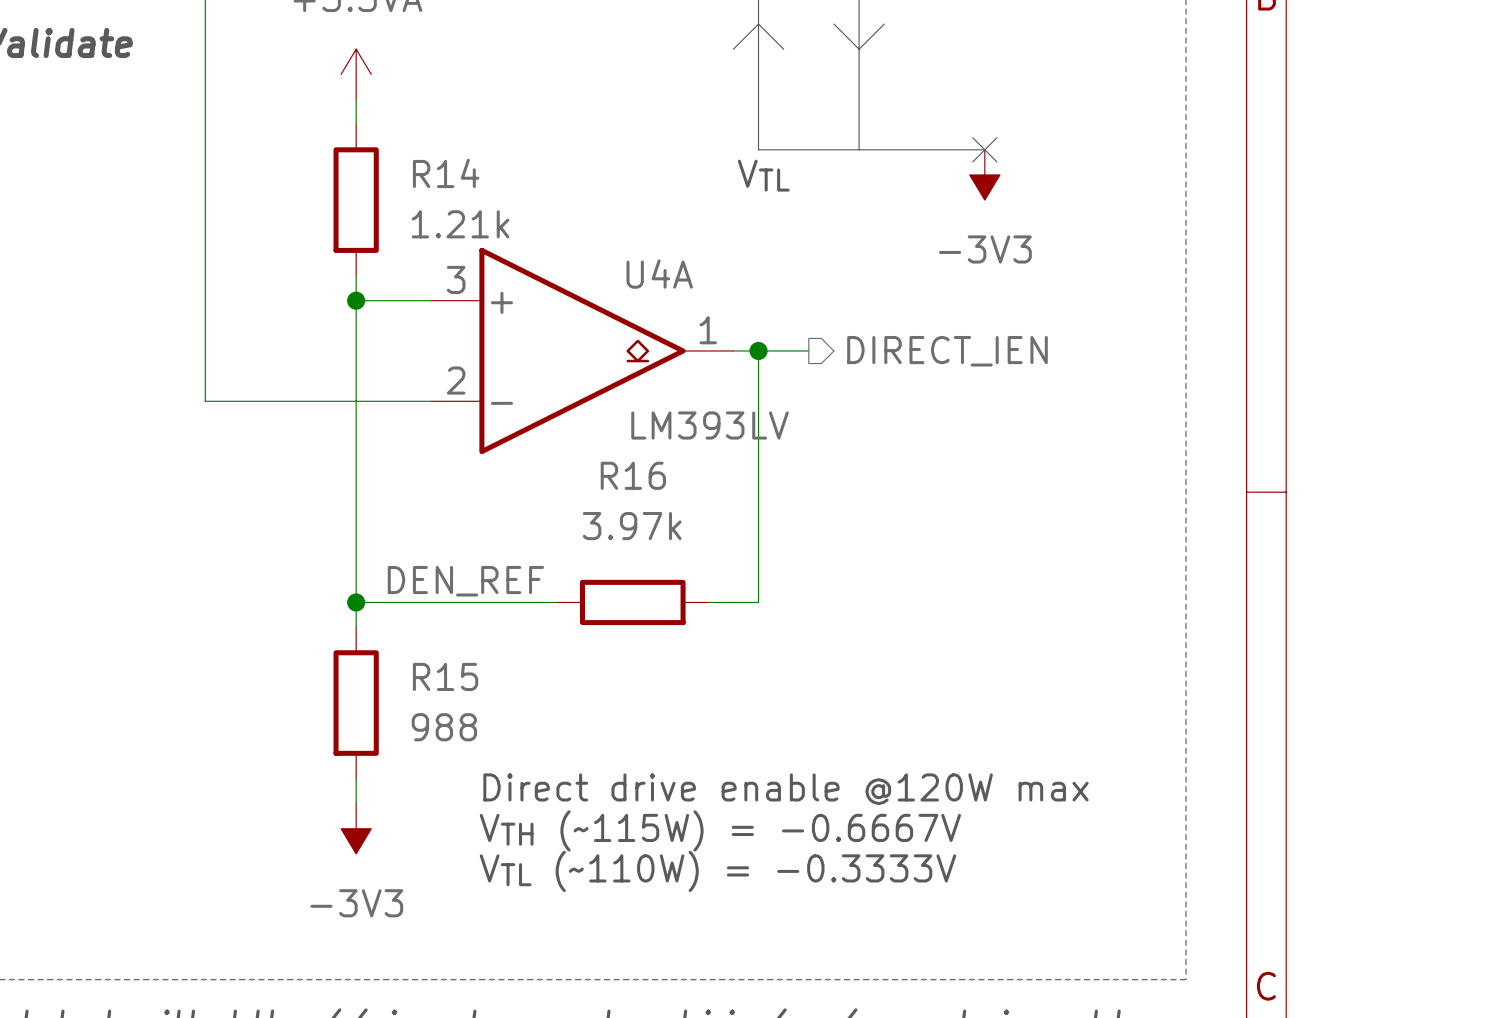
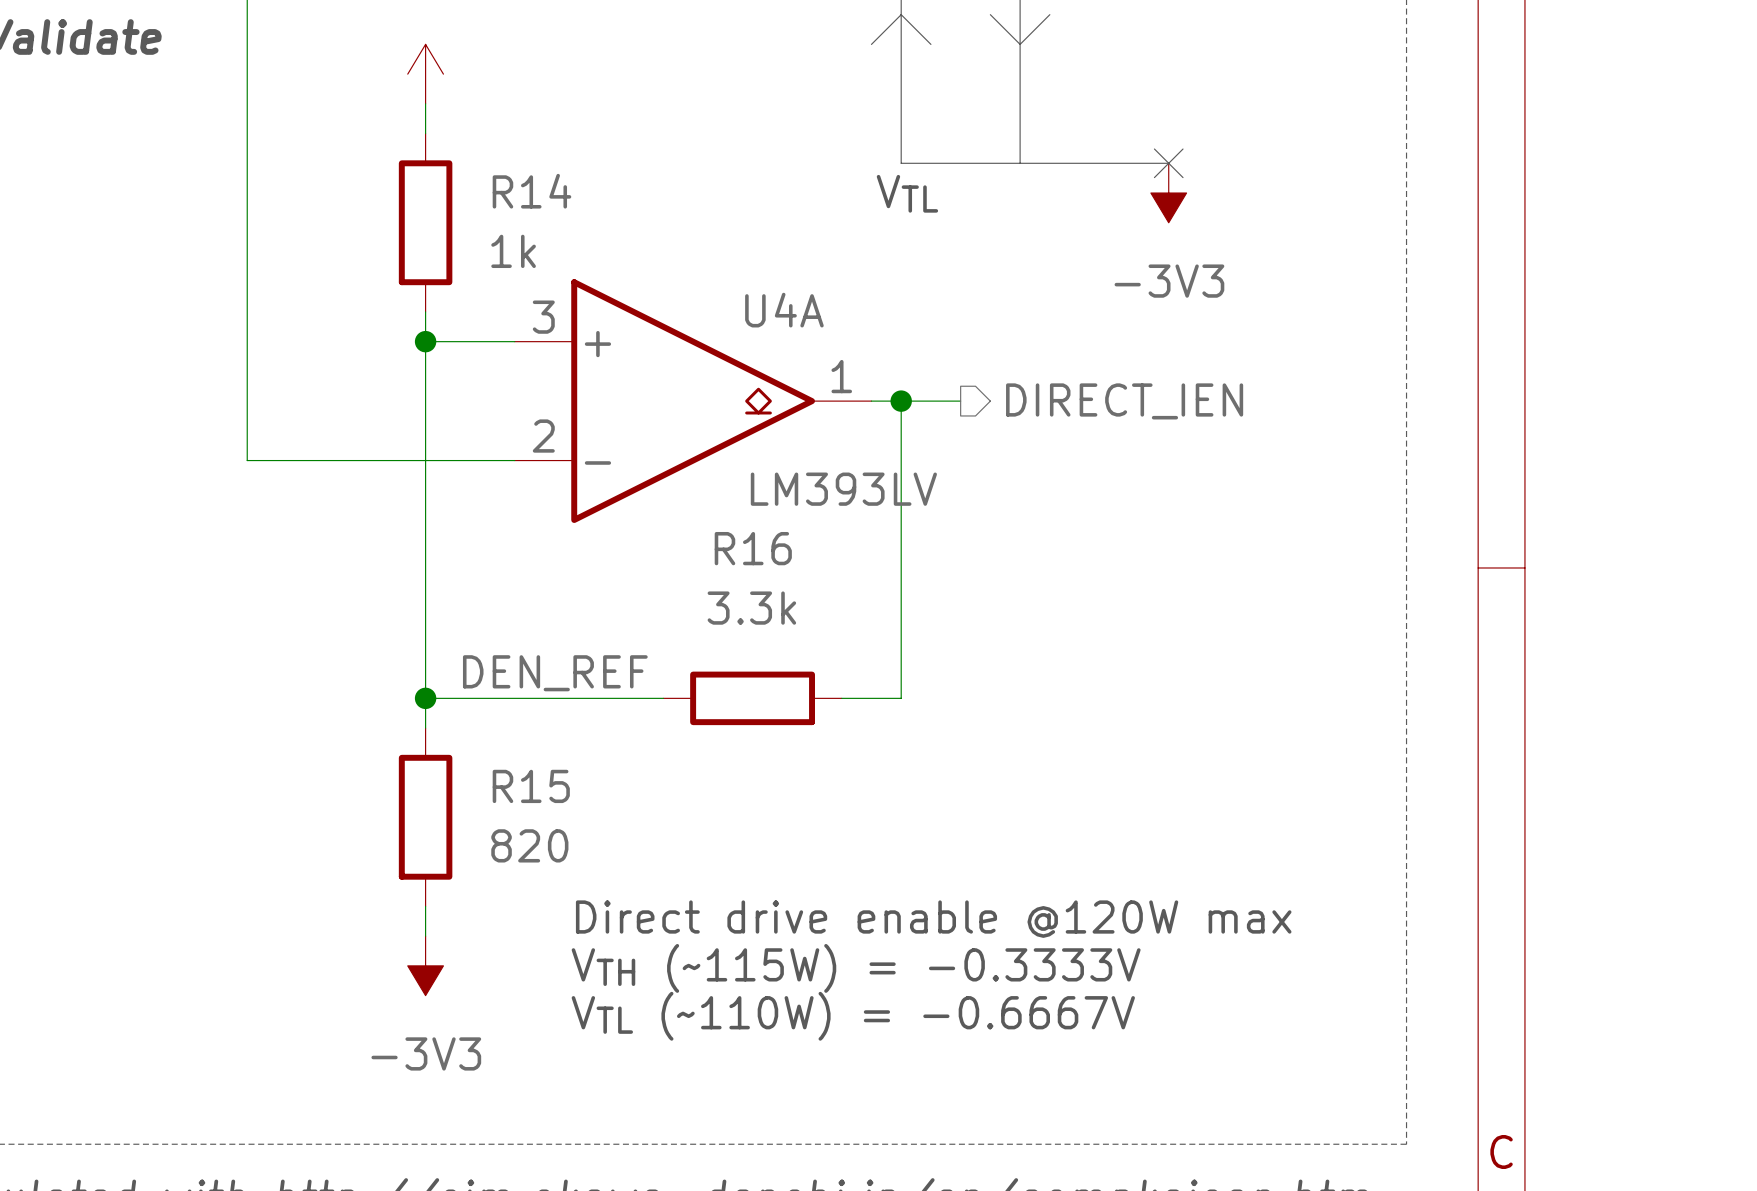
R14 value: 1.21k (460, 224) -> 1k (513, 251)
R16 value: 3.97k (632, 526) -> 3.3k (751, 608)
R15 value: 988 (444, 727) -> 820 (529, 845)
text: VTH (~115W) = -0.6667V (720, 830) -> VTH (~115W) = -0.3333V (856, 968)
text: VTL (~110W) = -0.3333V (717, 871) -> VTL (~110W) = -0.6667V (853, 1016)

